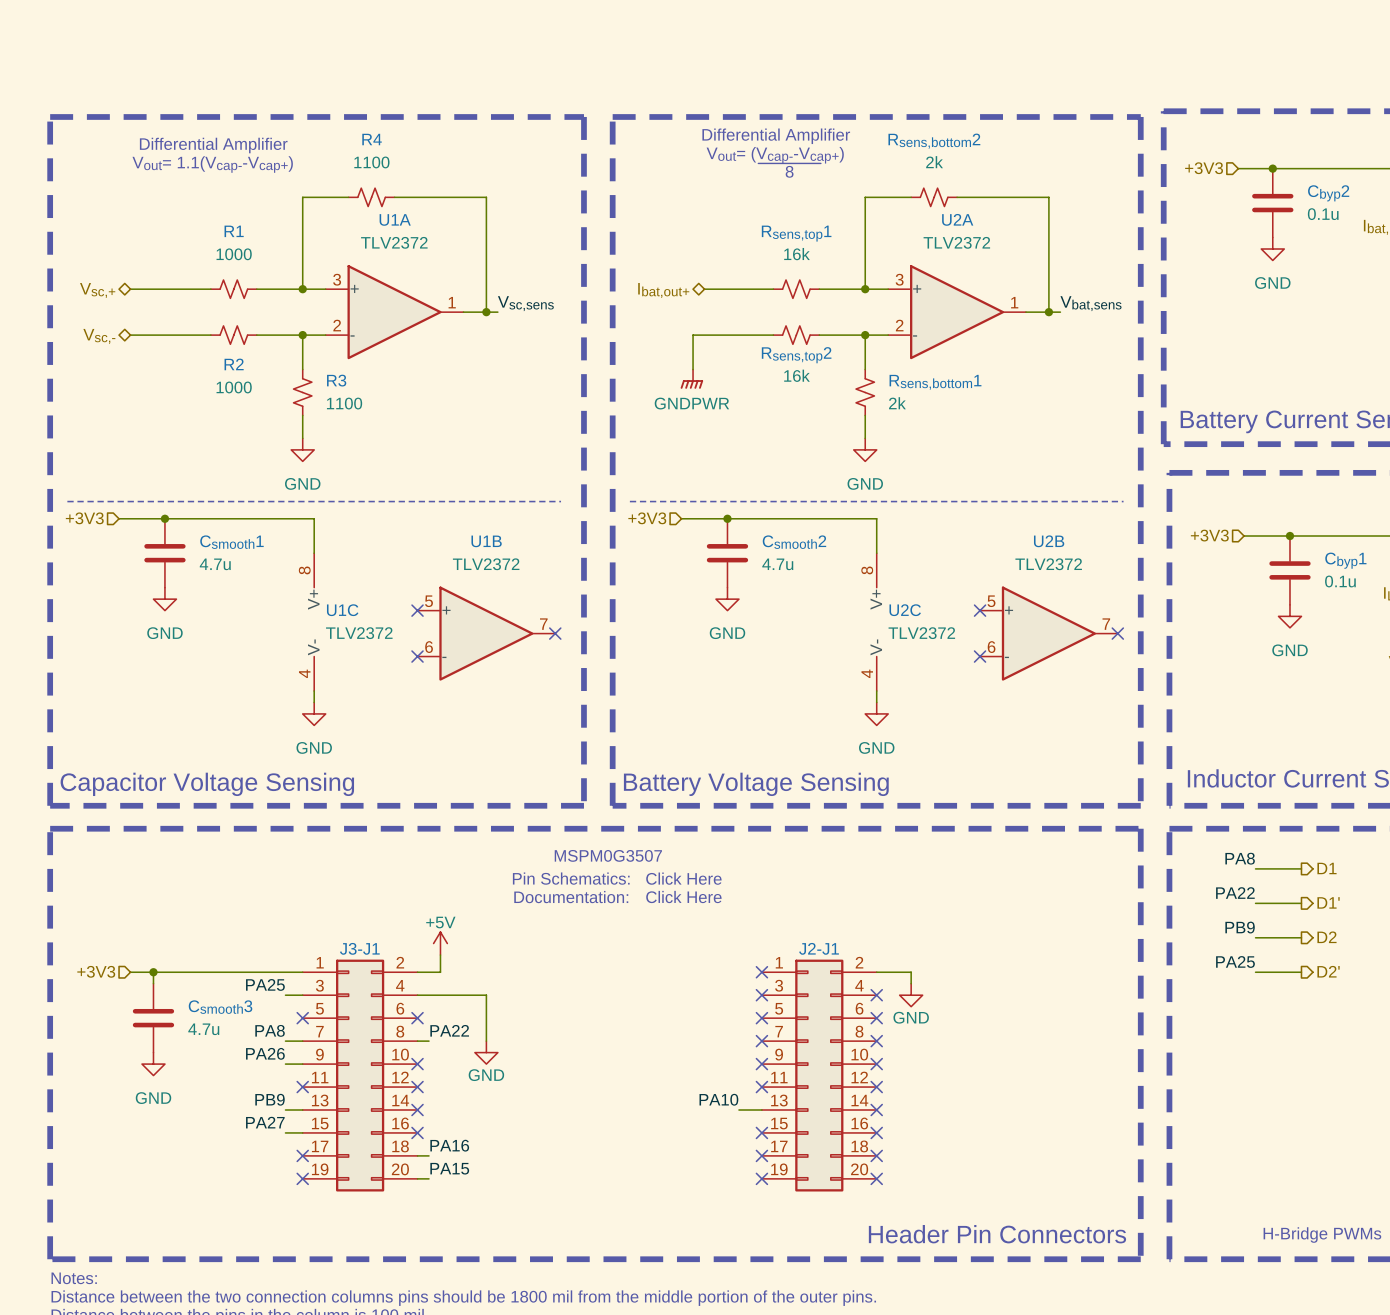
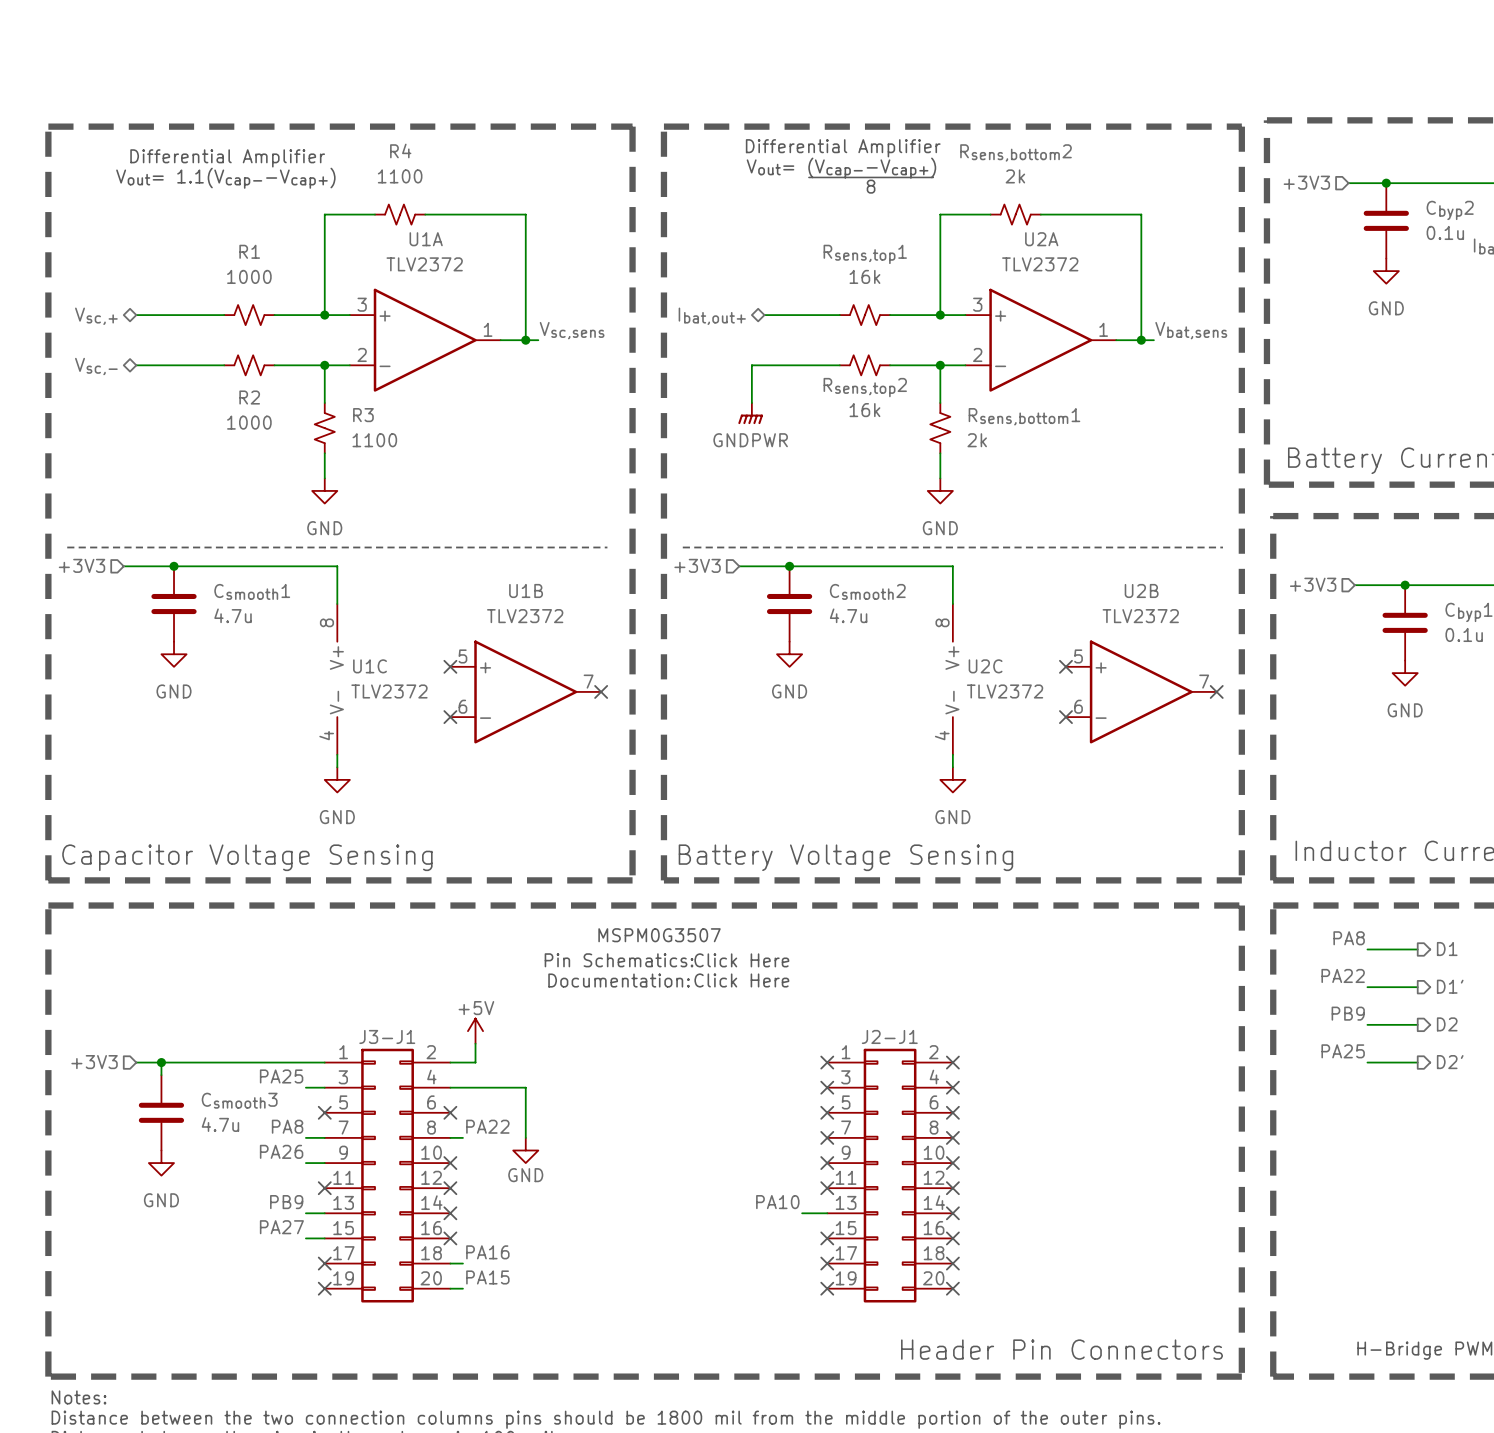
wire: (876, 972) (911, 972) (911, 983) -> none
no-connect mark: none -> (952, 1062)
power symbol: GND (911, 995) -> none

